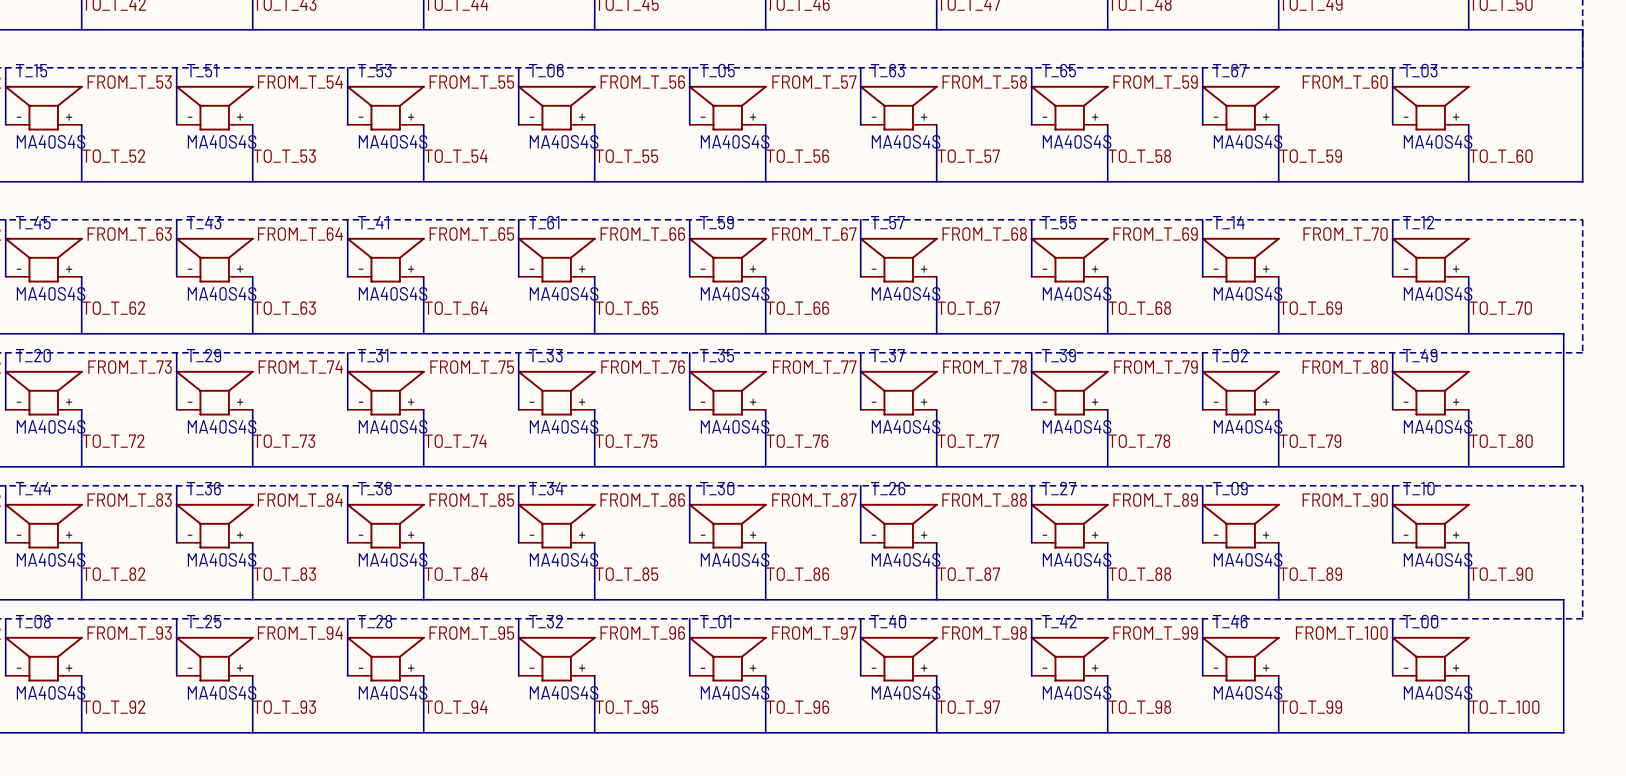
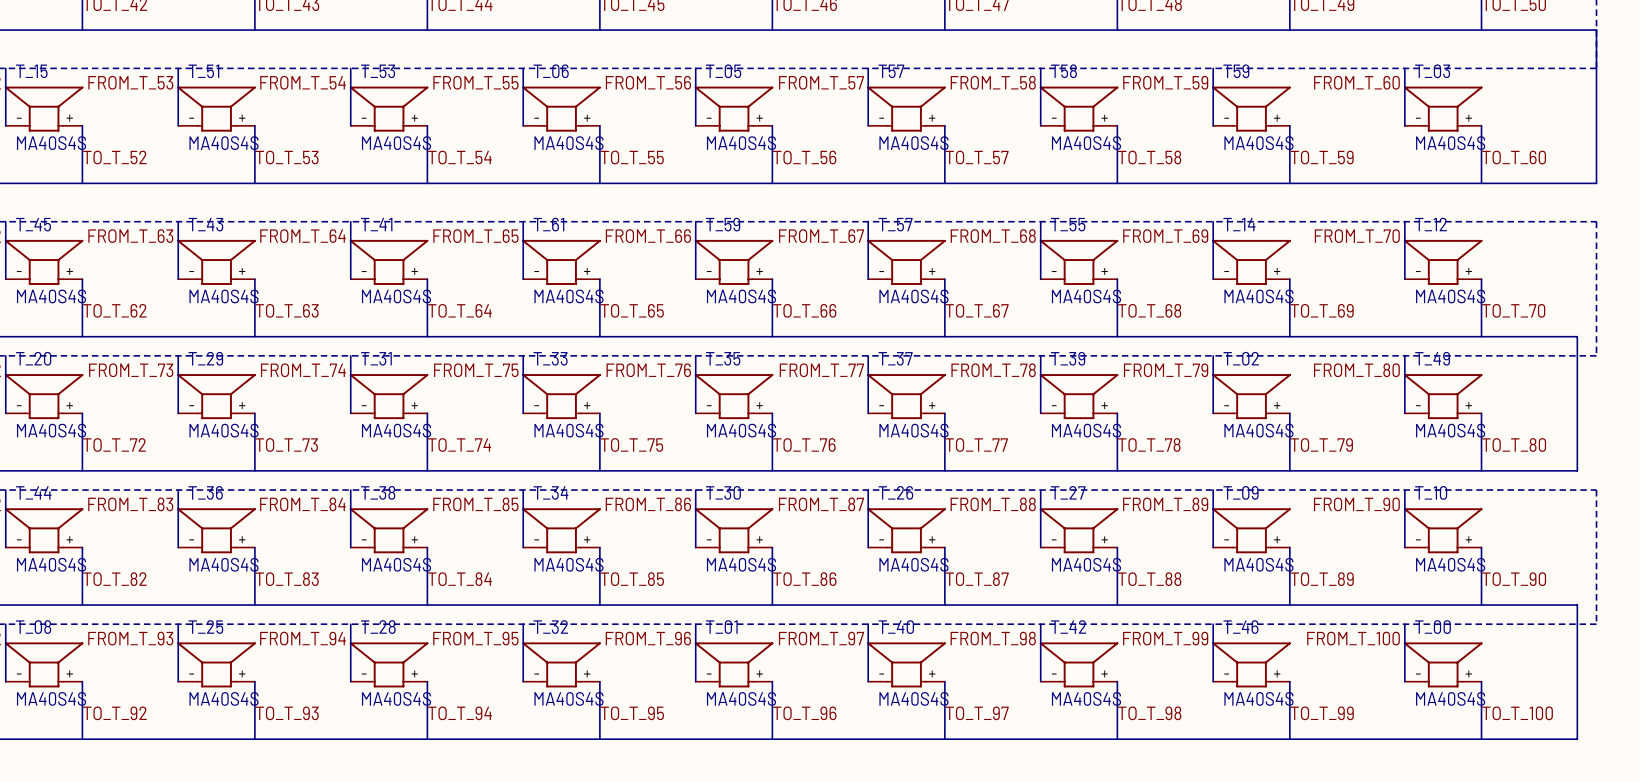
T_63 name: T_63 (887, 70) -> T57 (891, 71)
T_65 name: T_65 (1058, 70) -> T58 (1063, 71)
T_67 name: T_67 (1229, 70) -> T59 (1236, 71)

